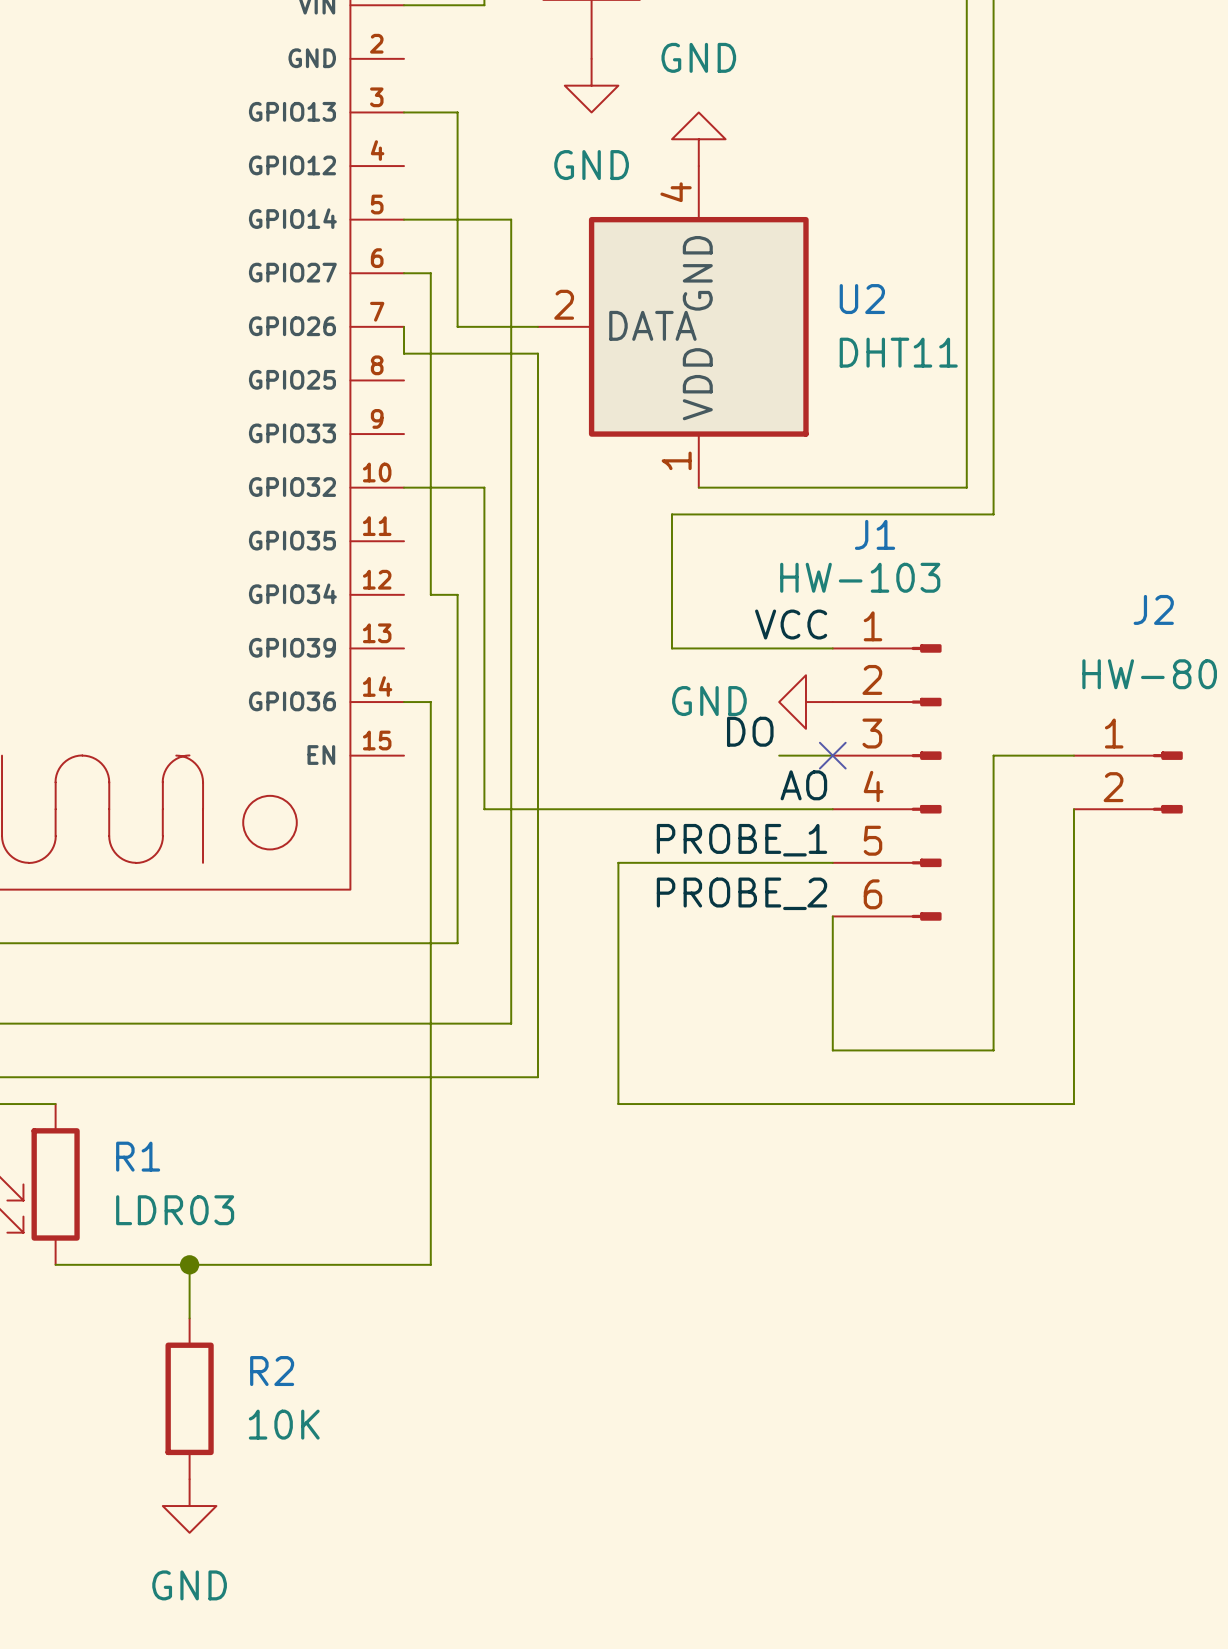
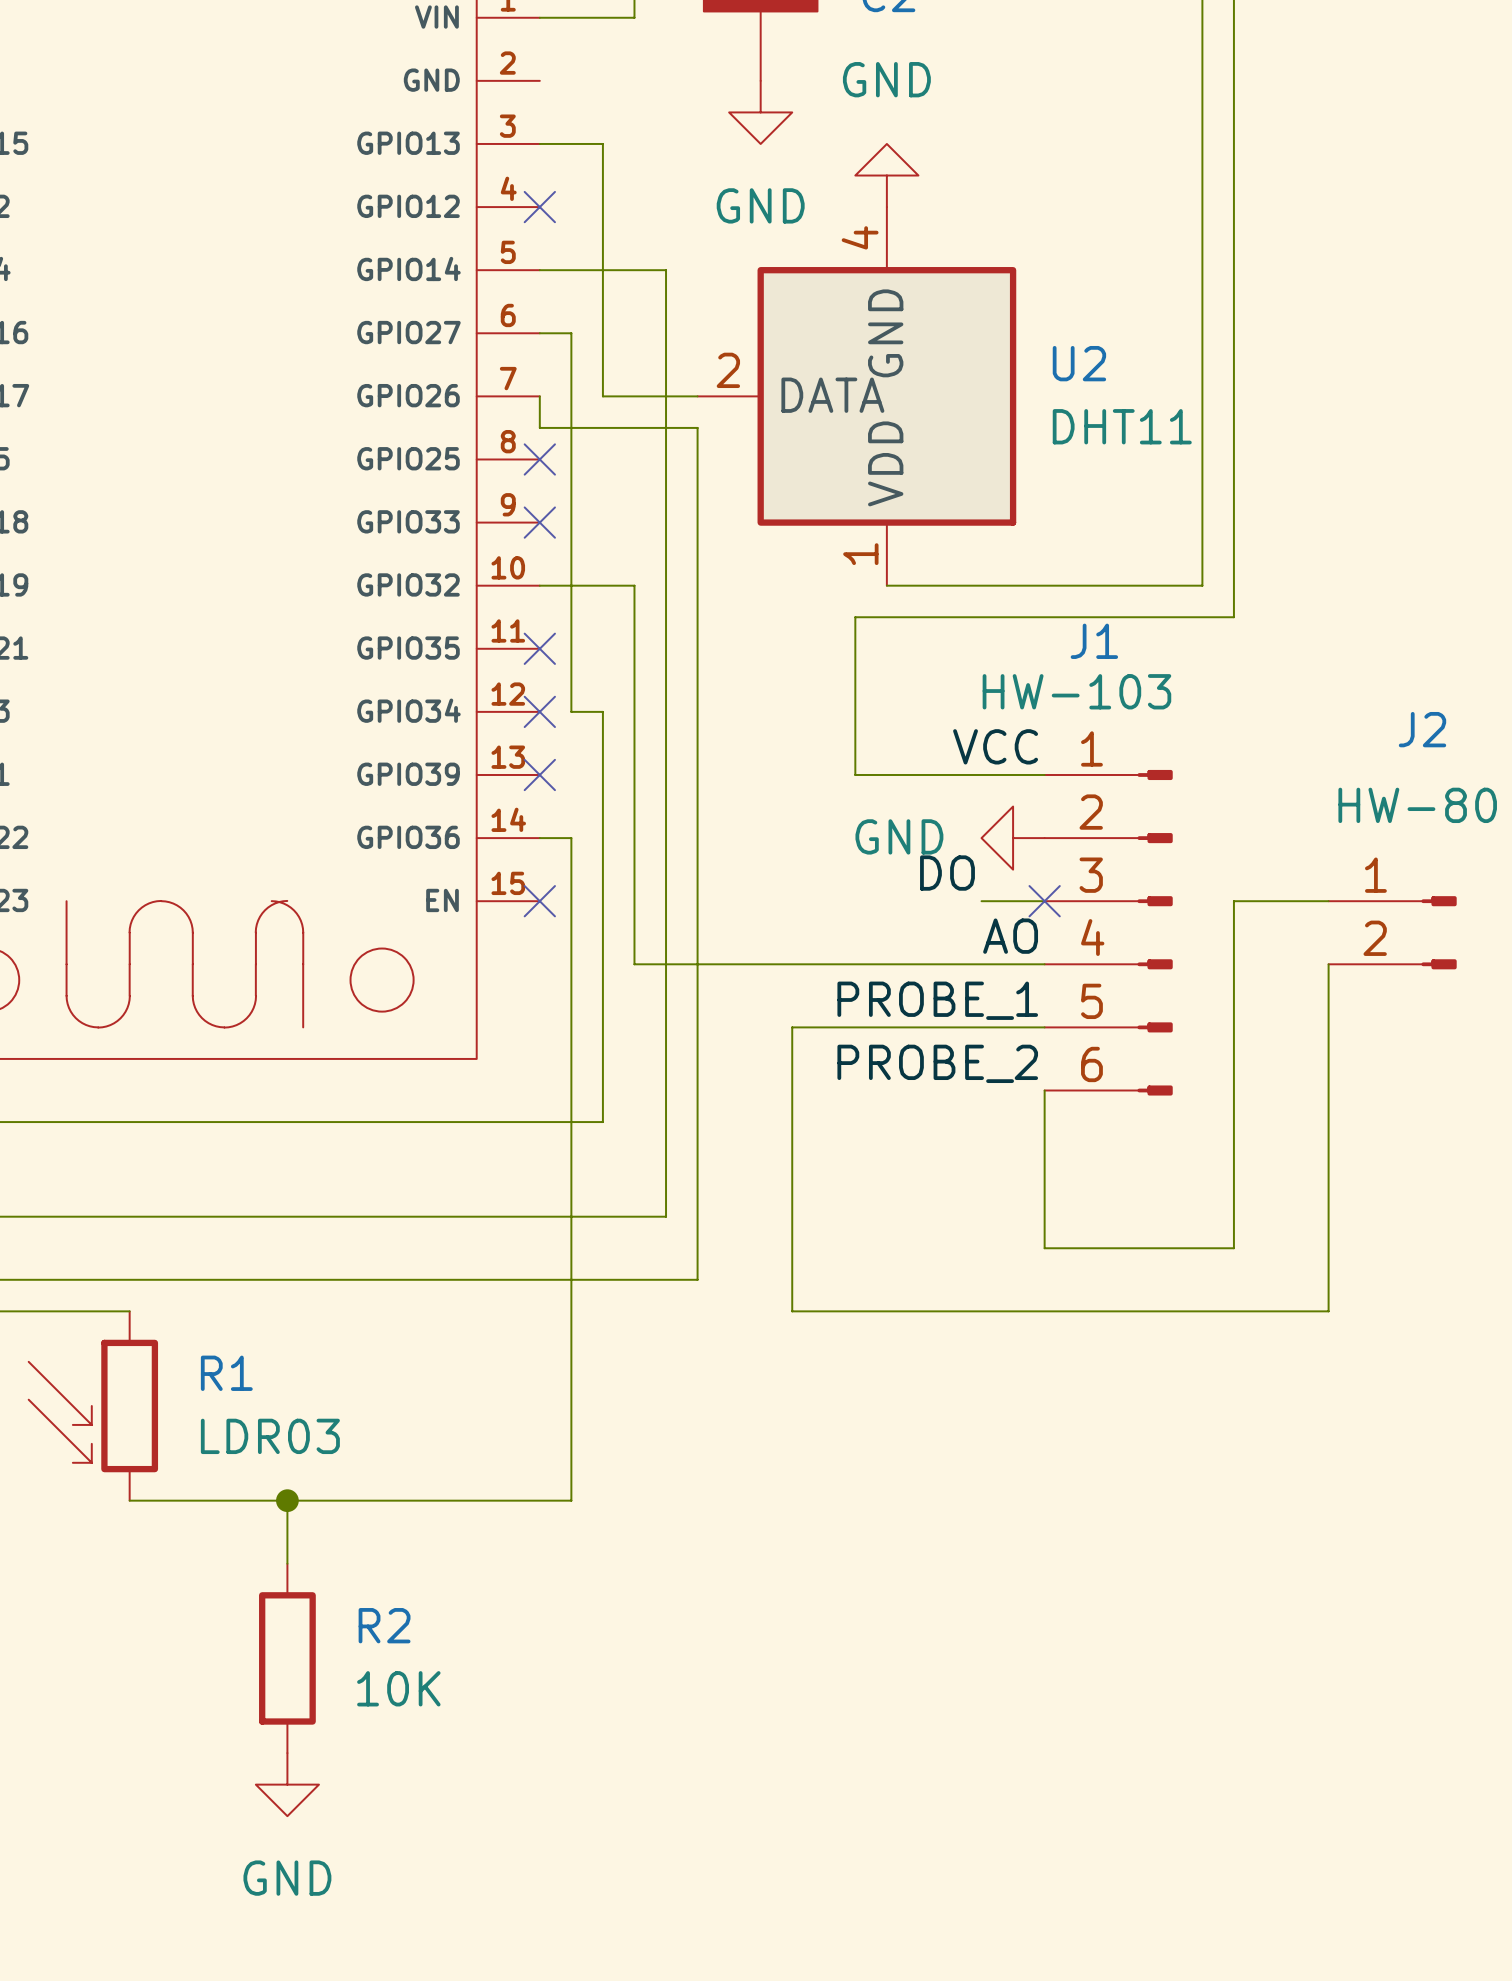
no-connect mark: none -> (539, 207)
no-connect mark: none -> (539, 459)
no-connect mark: none -> (539, 522)
no-connect mark: none -> (539, 648)
no-connect mark: none -> (539, 711)
no-connect mark: none -> (539, 774)
no-connect mark: none -> (539, 901)

